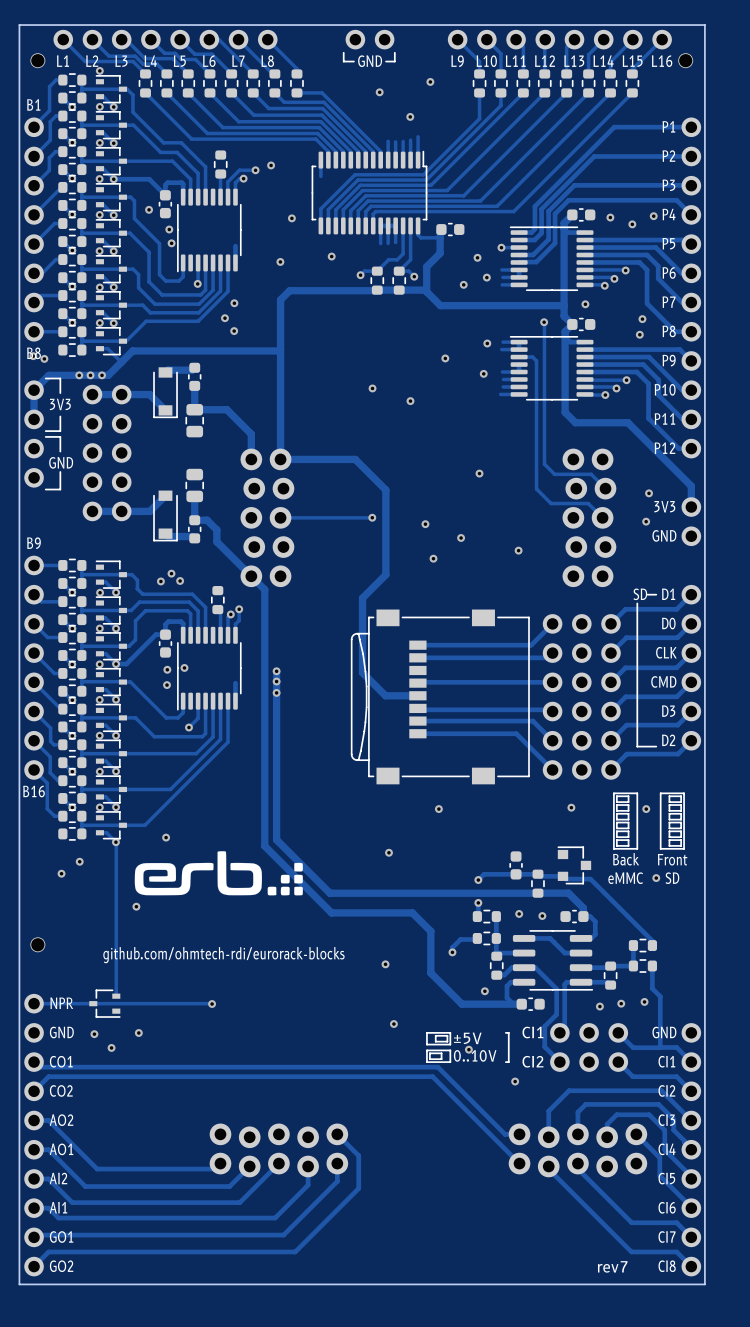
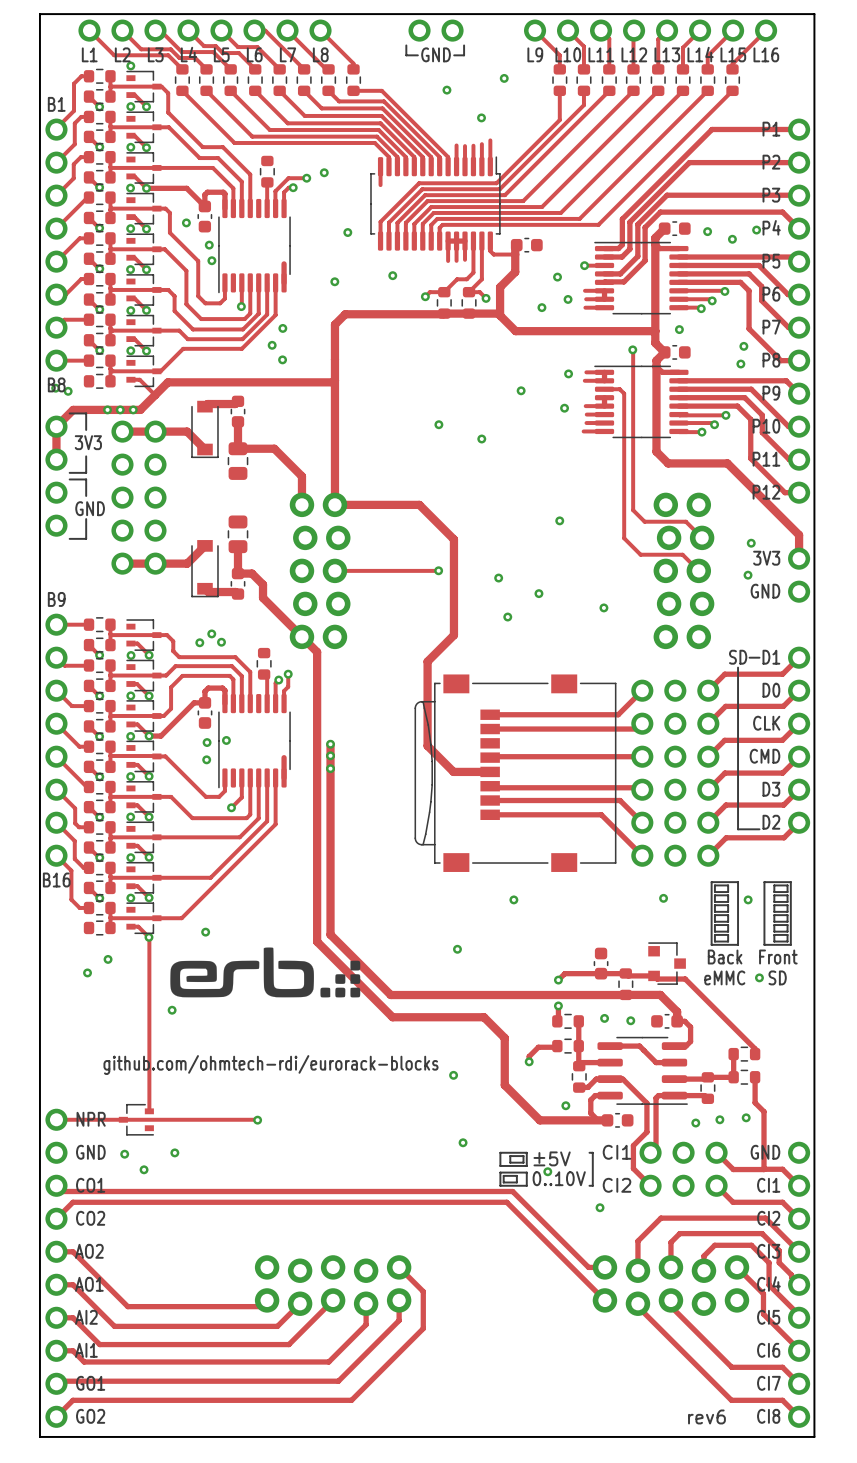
part: (37, 60) -> none
part: (685, 60) -> none
part: (37, 944) -> none
text: rev7 (612, 1266) -> rev6 (706, 1416)

